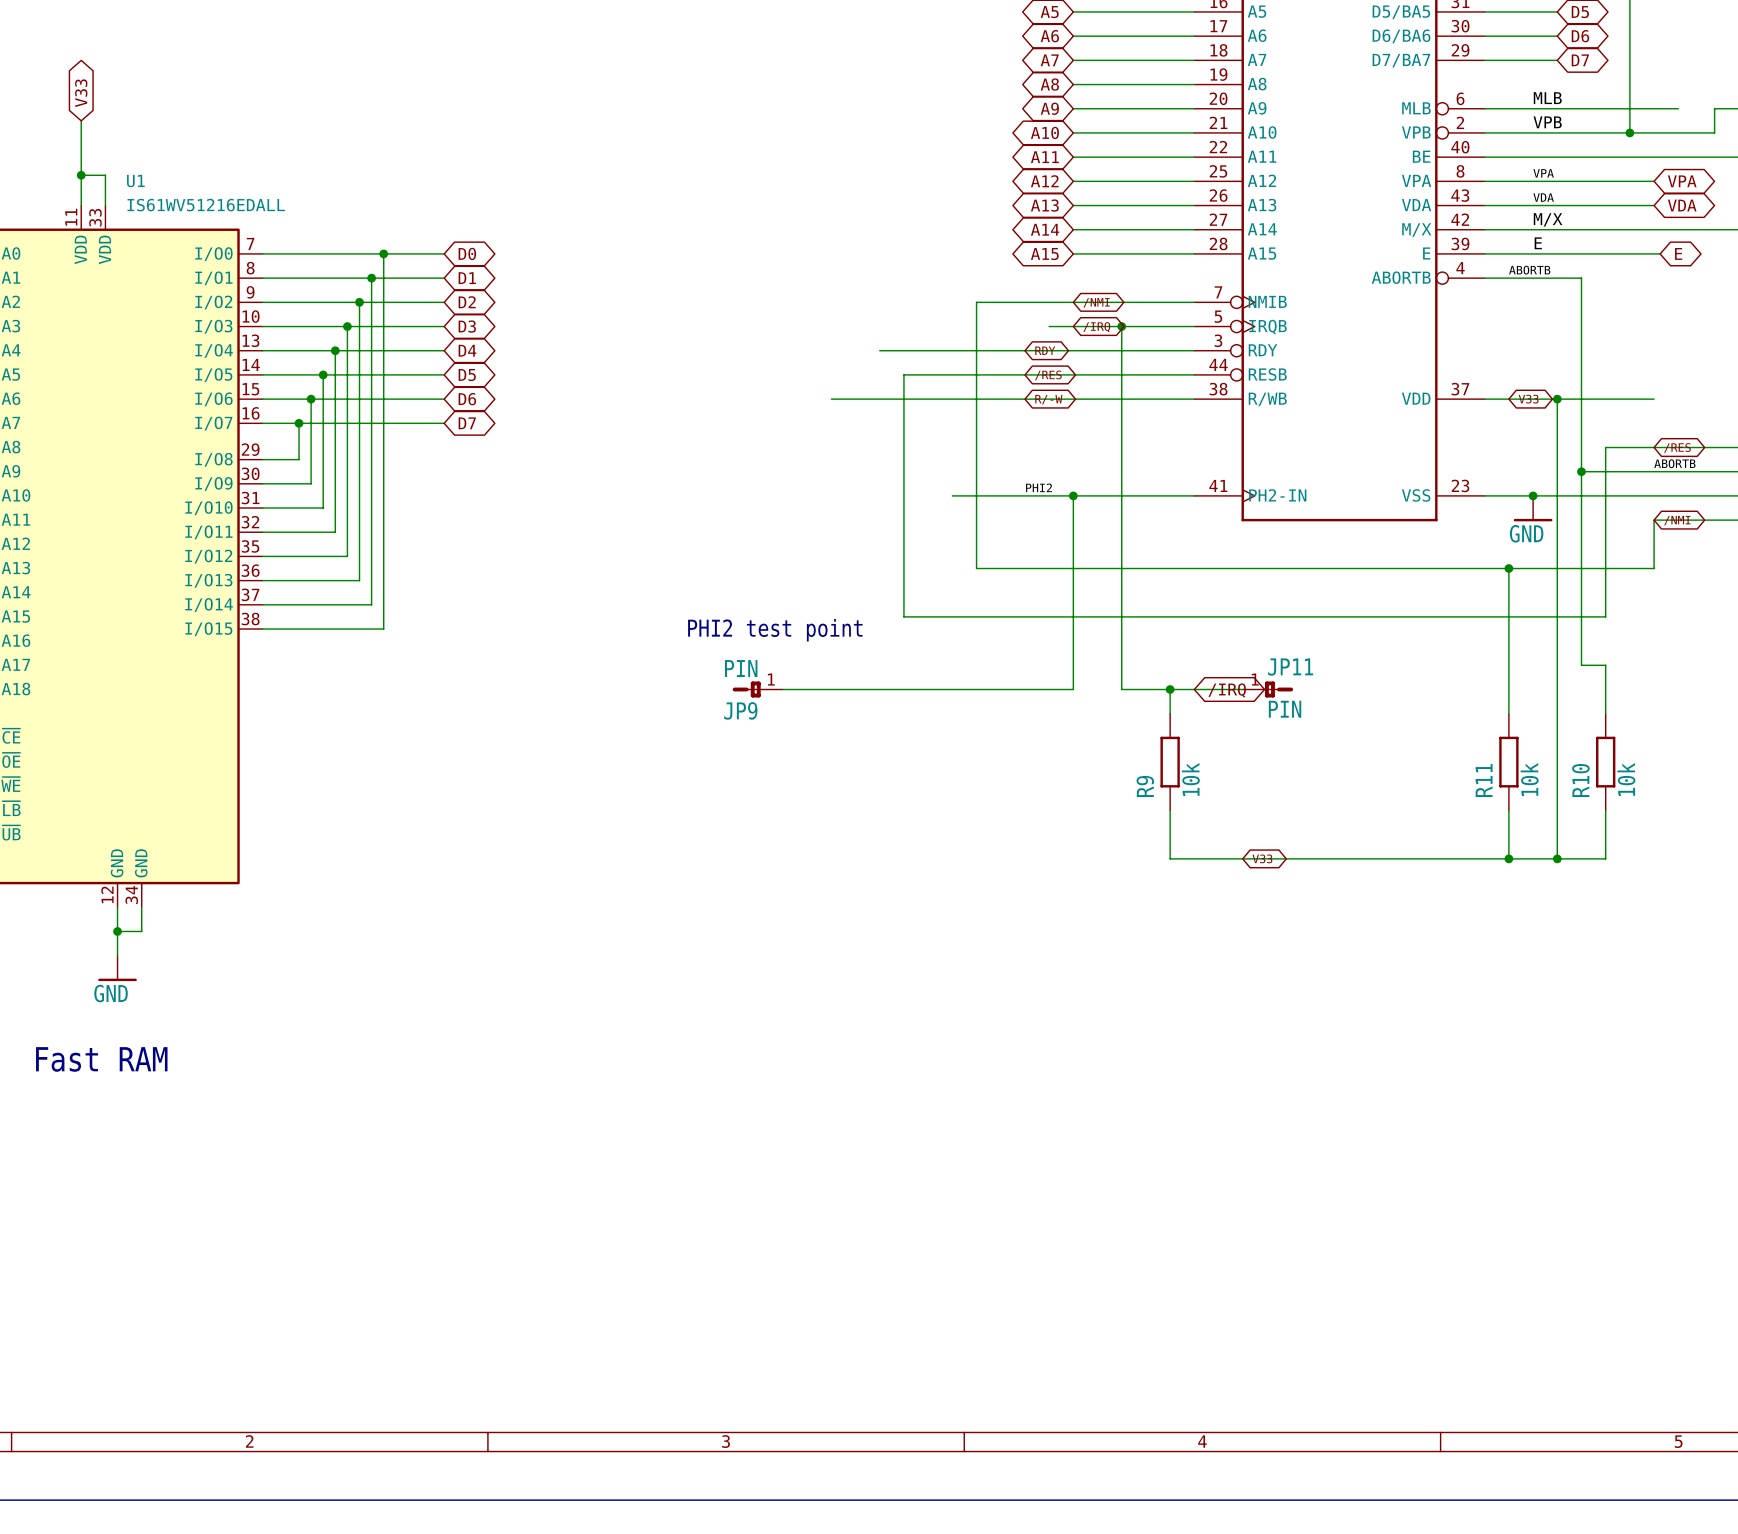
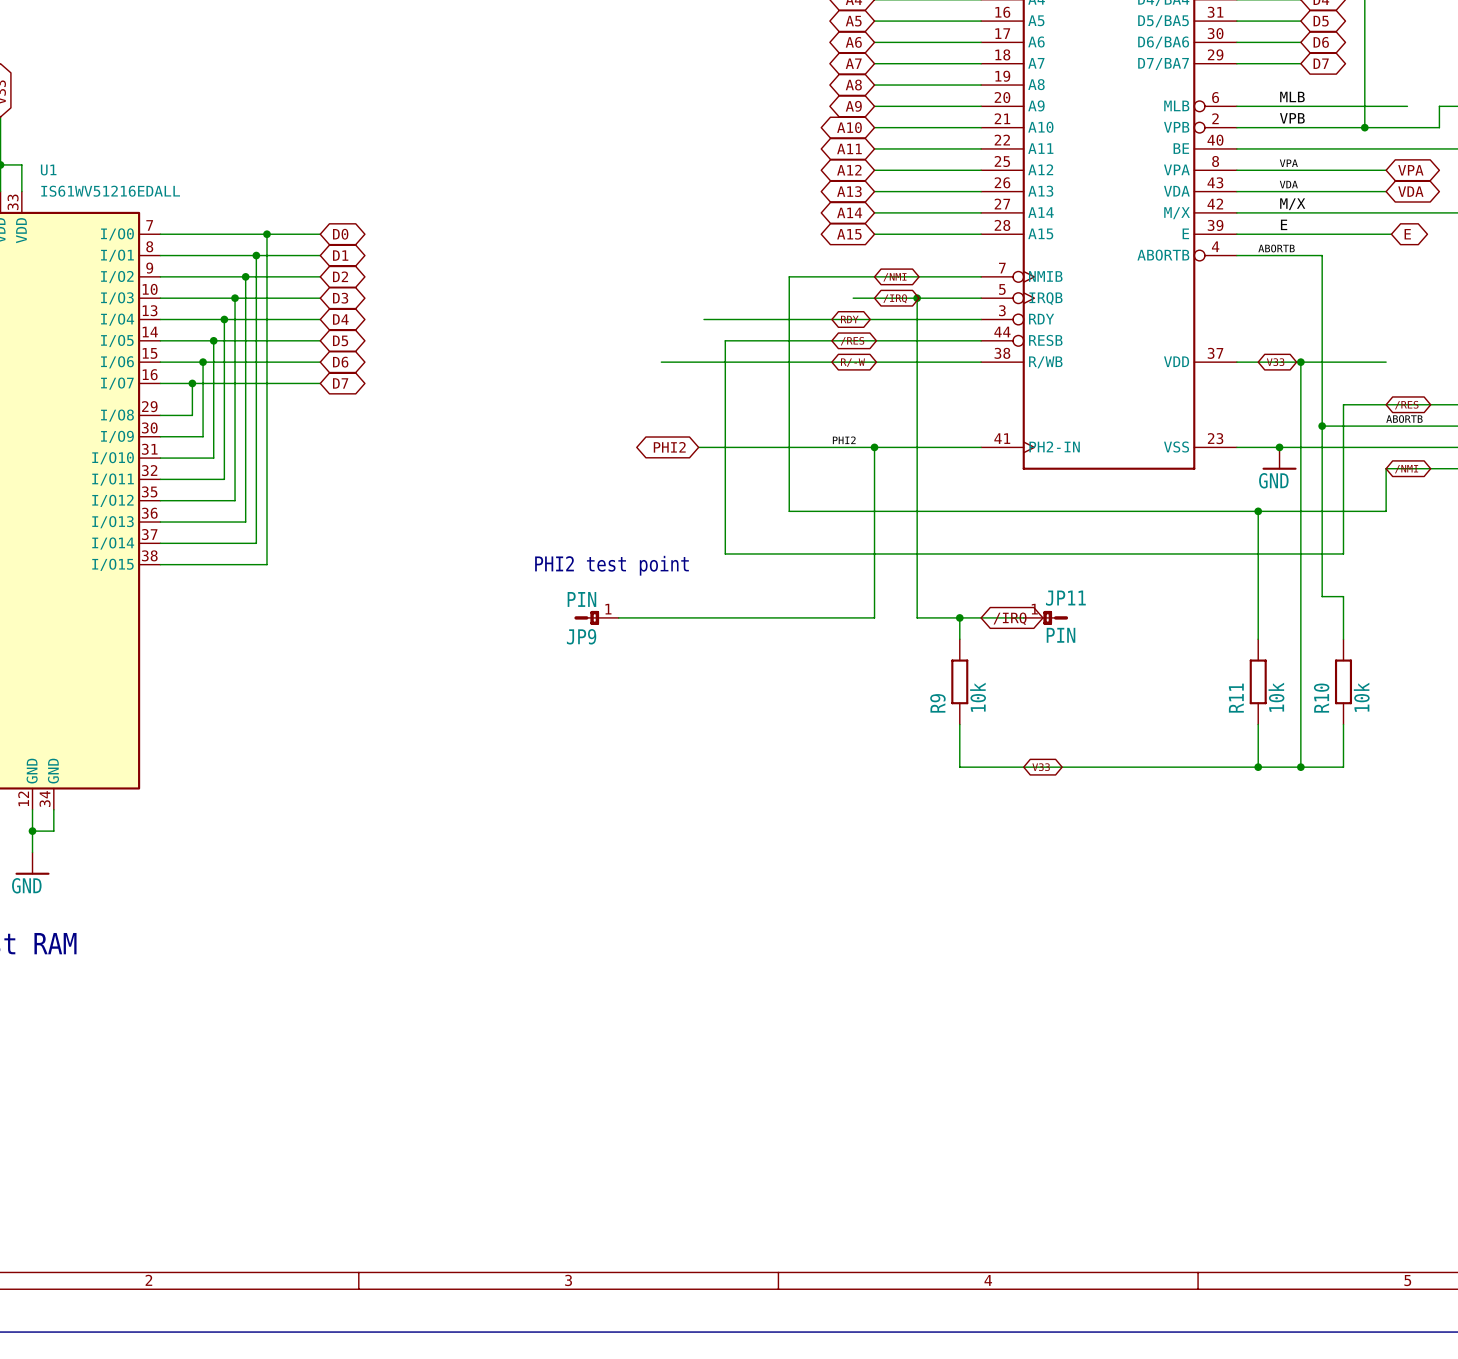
global label: none -> PHI2 (669, 447)
wire: none -> (698, 447) (767, 447)

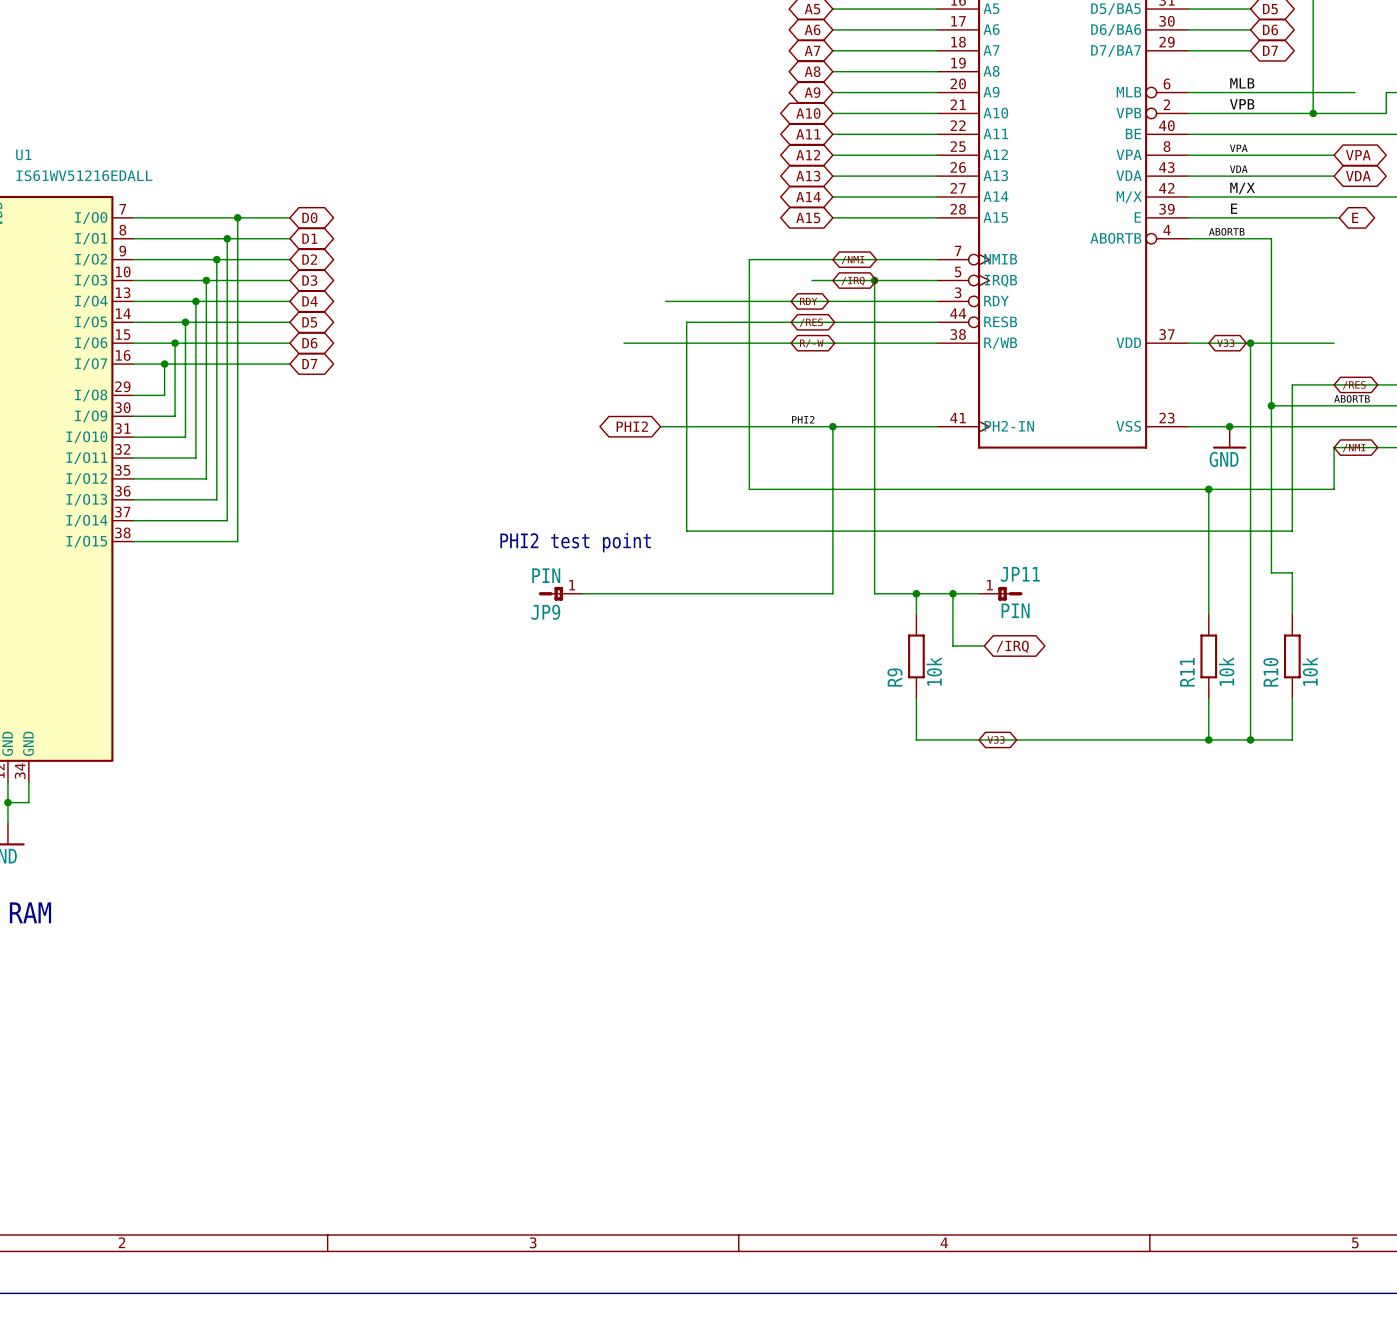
wire: none -> (952, 593) (952, 645) (984, 645)
junction: none -> (952, 593)
global label position: /IRQ (1010, 618) -> /IRQ (1012, 646)

